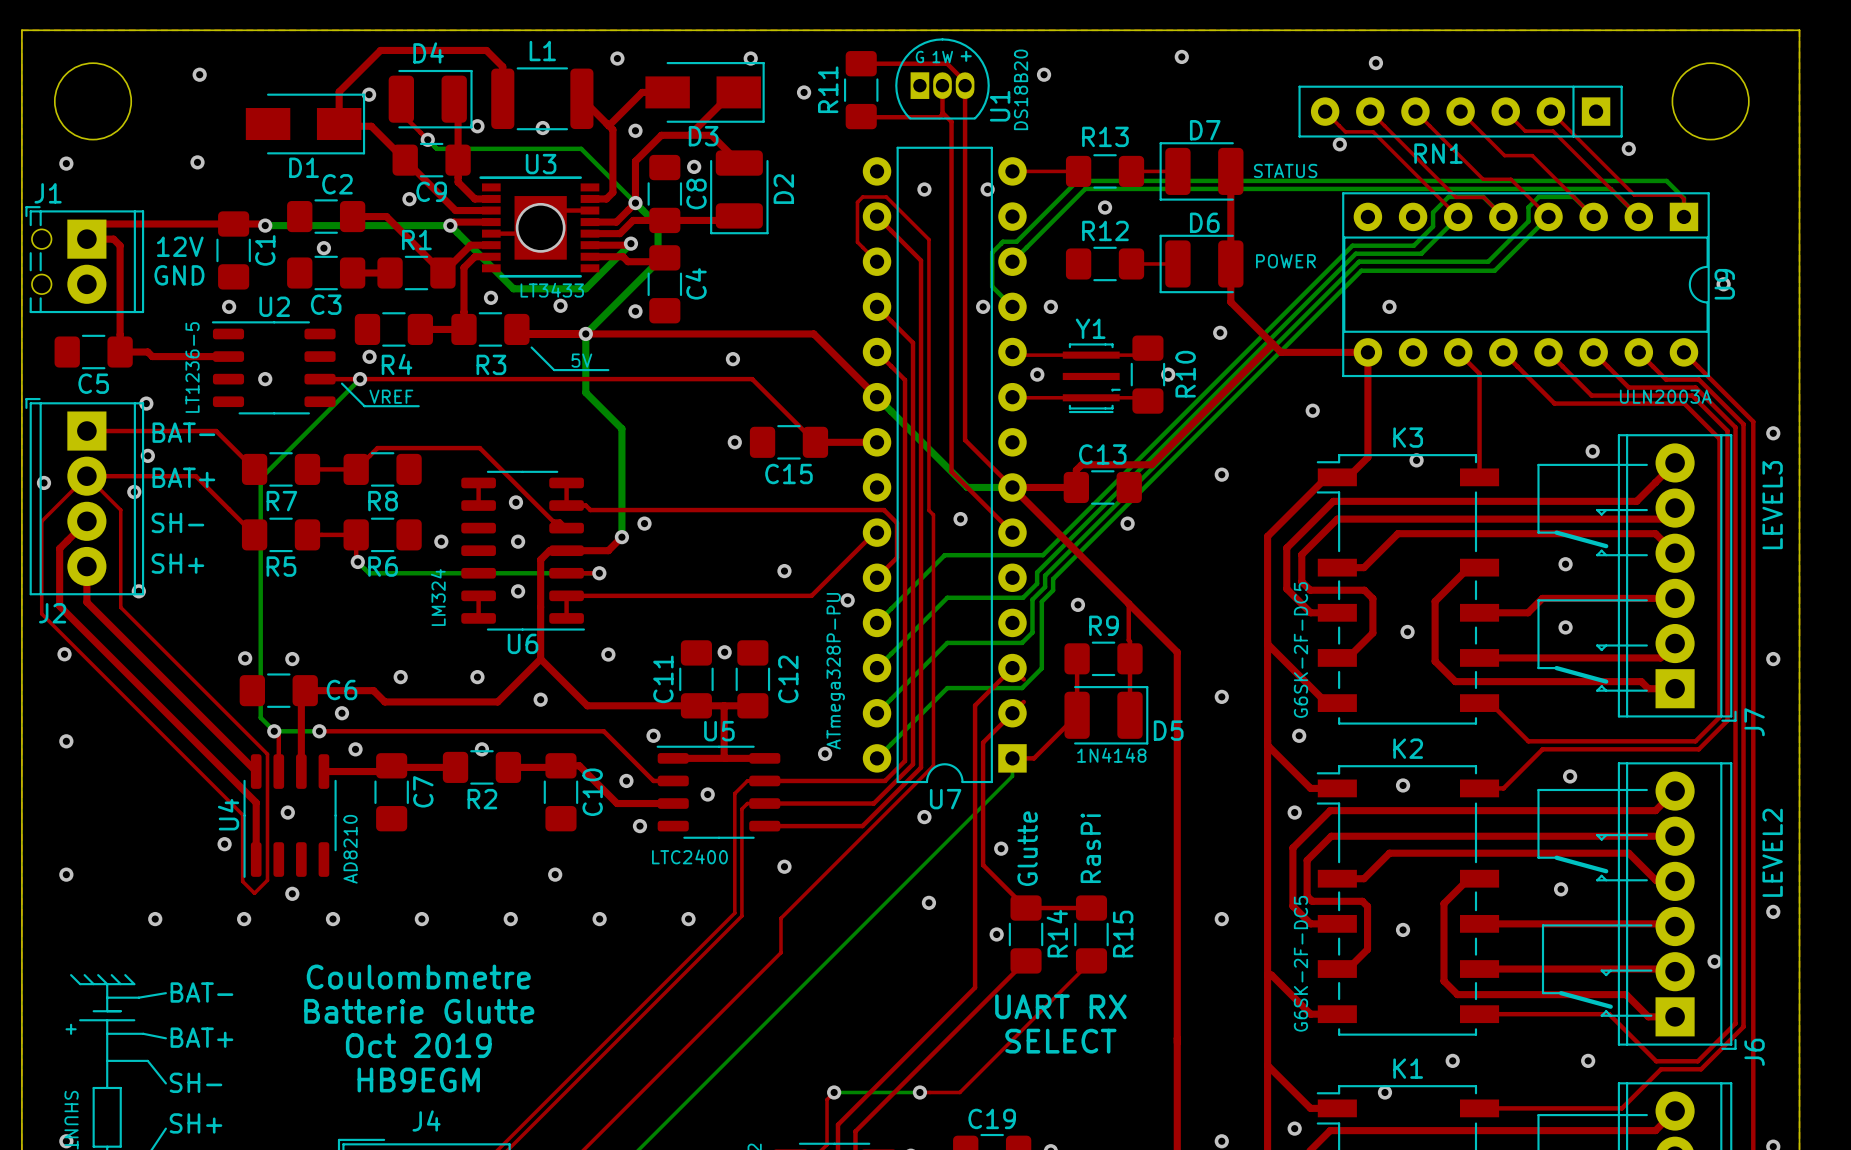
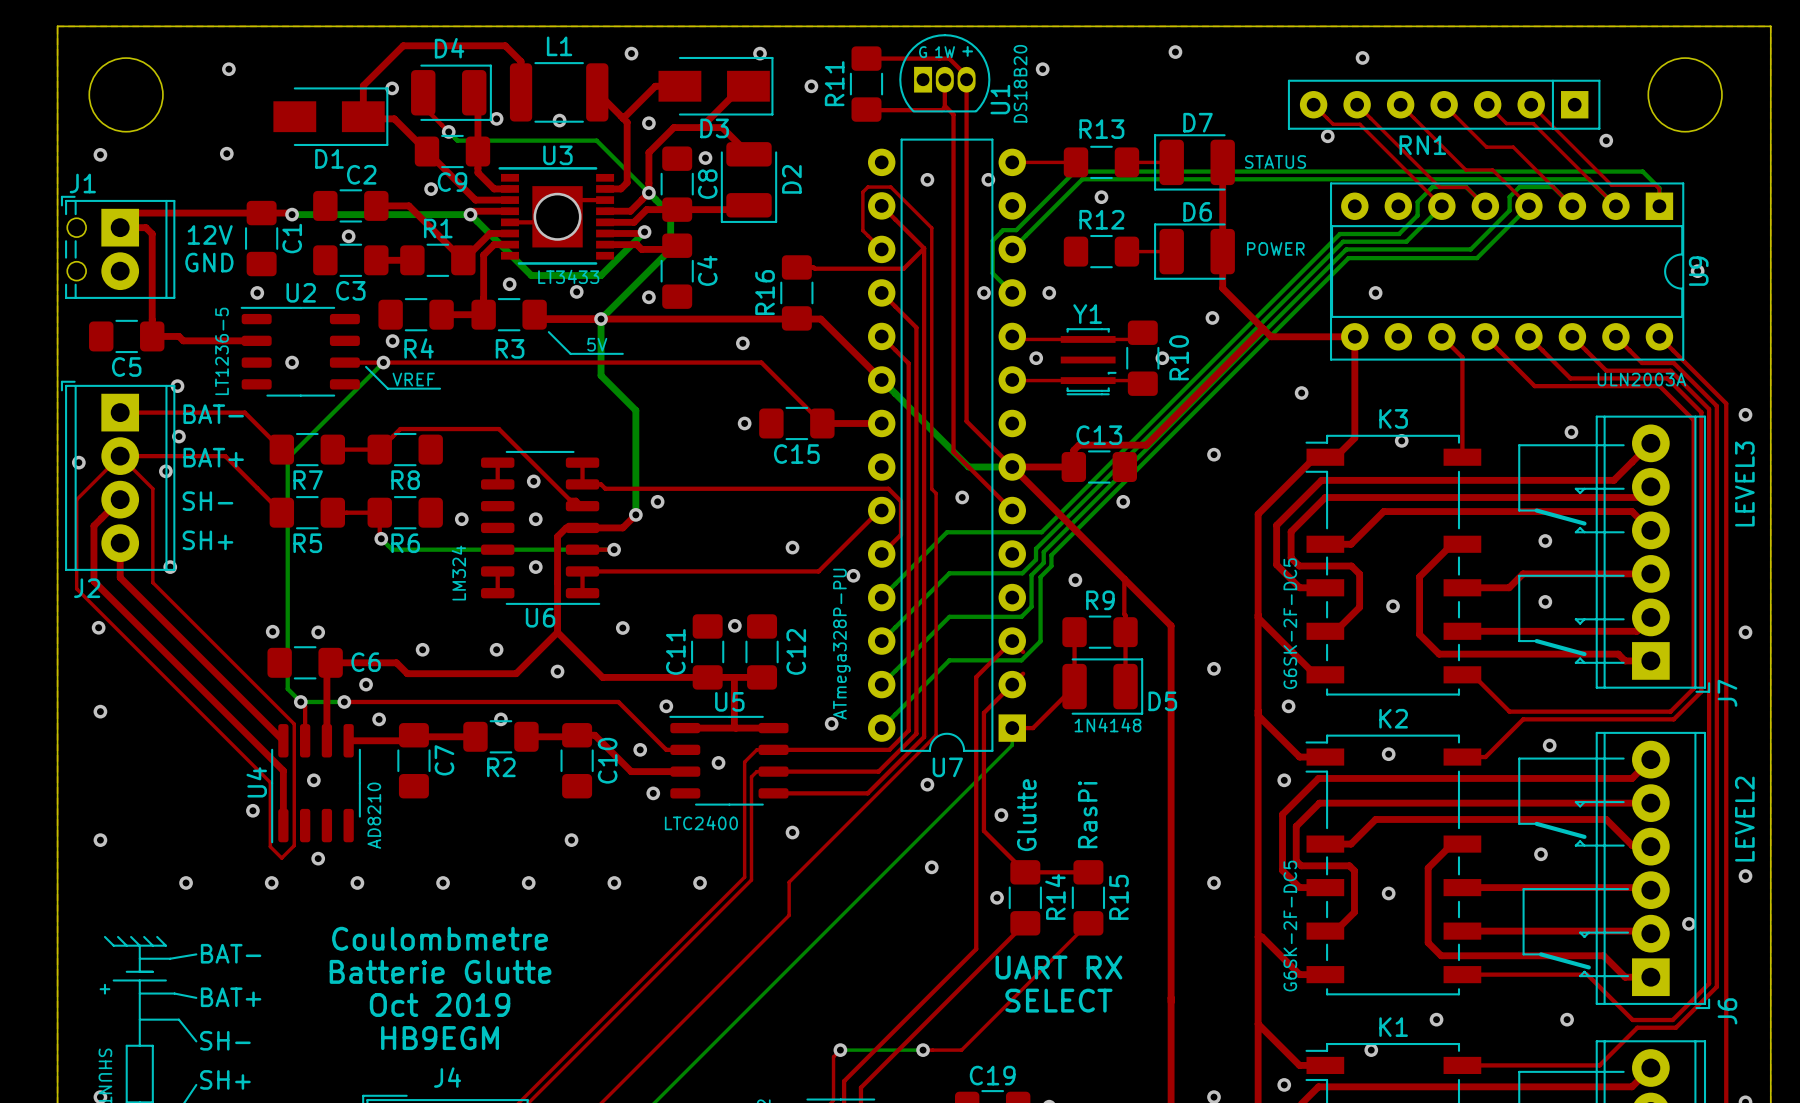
top track: none -> (924, 248) (903, 268) (796, 267)
R16: none -> (796, 292)

